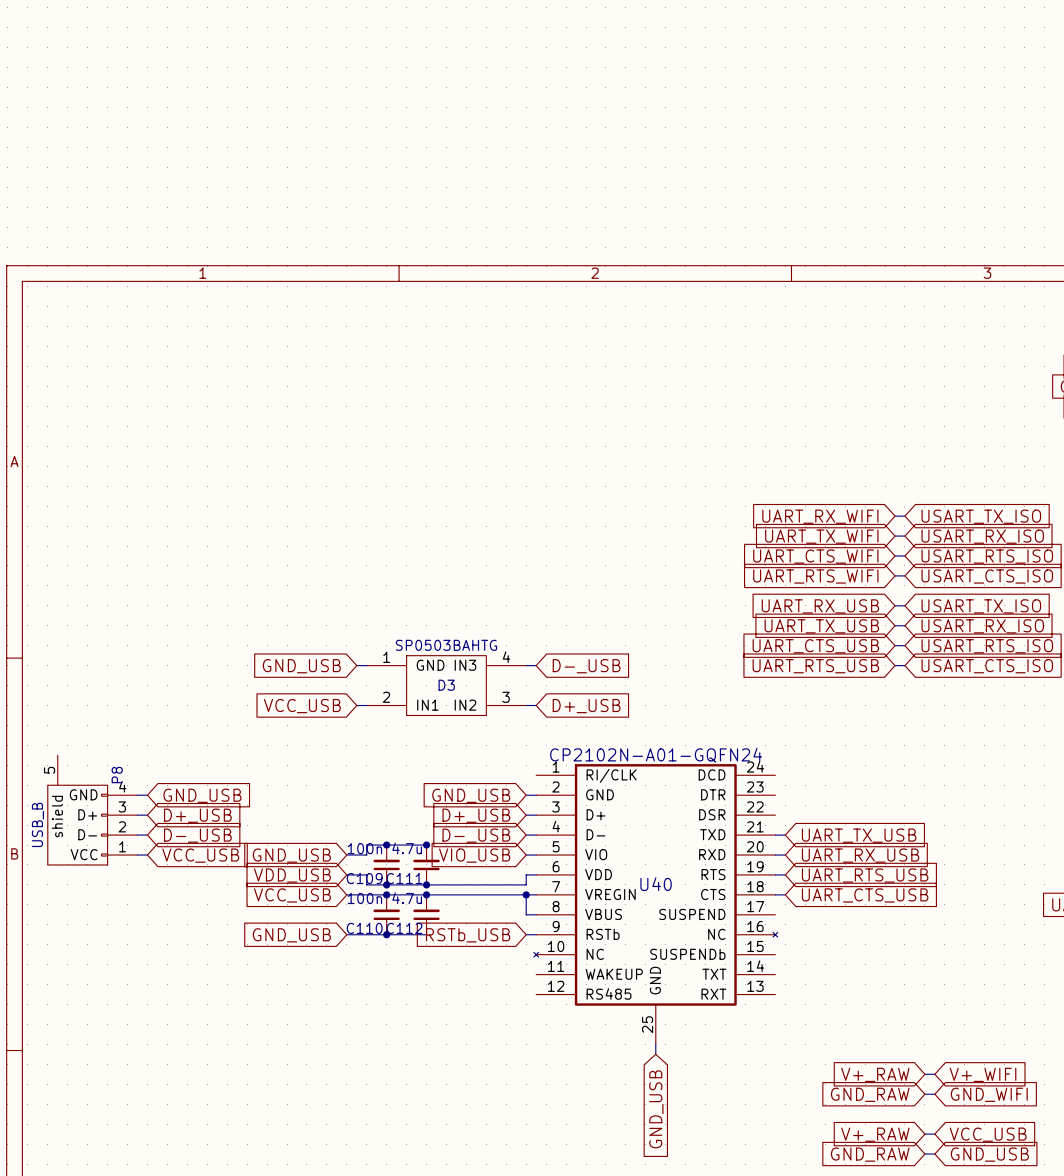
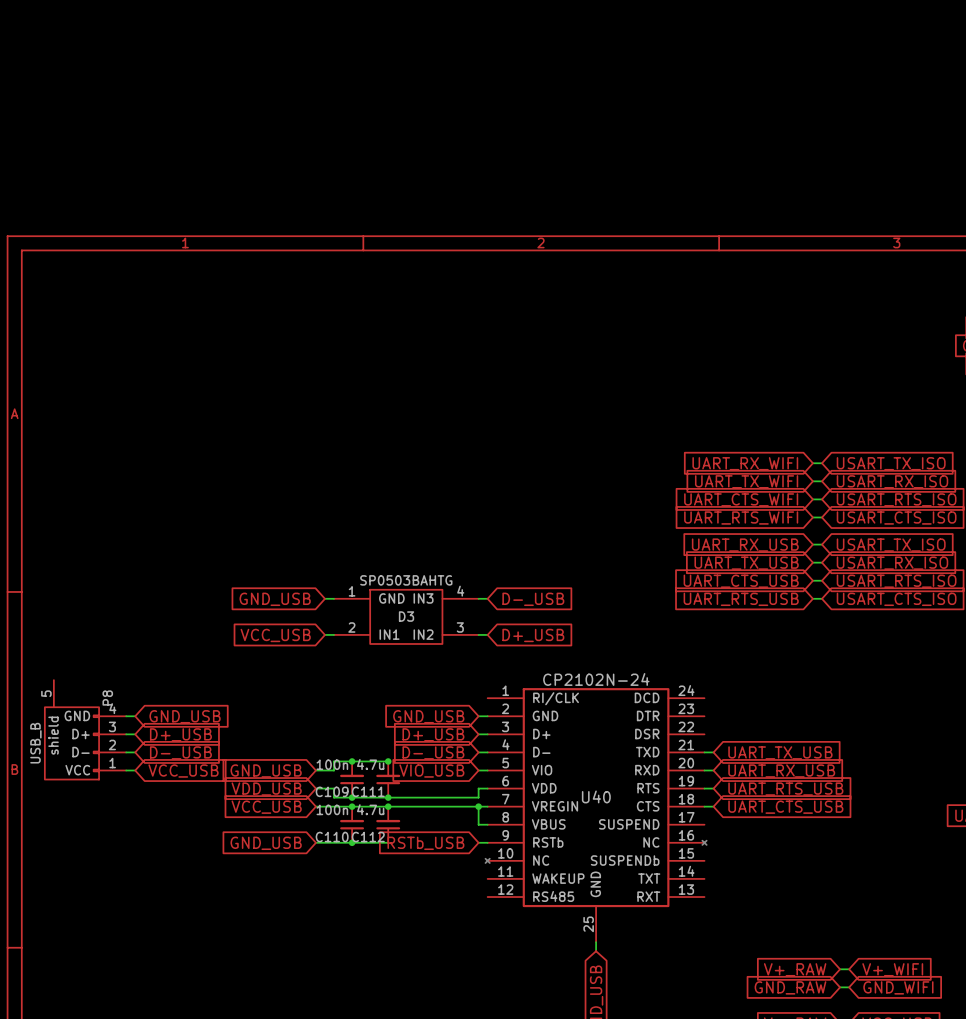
U40 value: CP2102N-A01-GQFN24 (656, 755) -> CP2102N-24 (596, 679)

